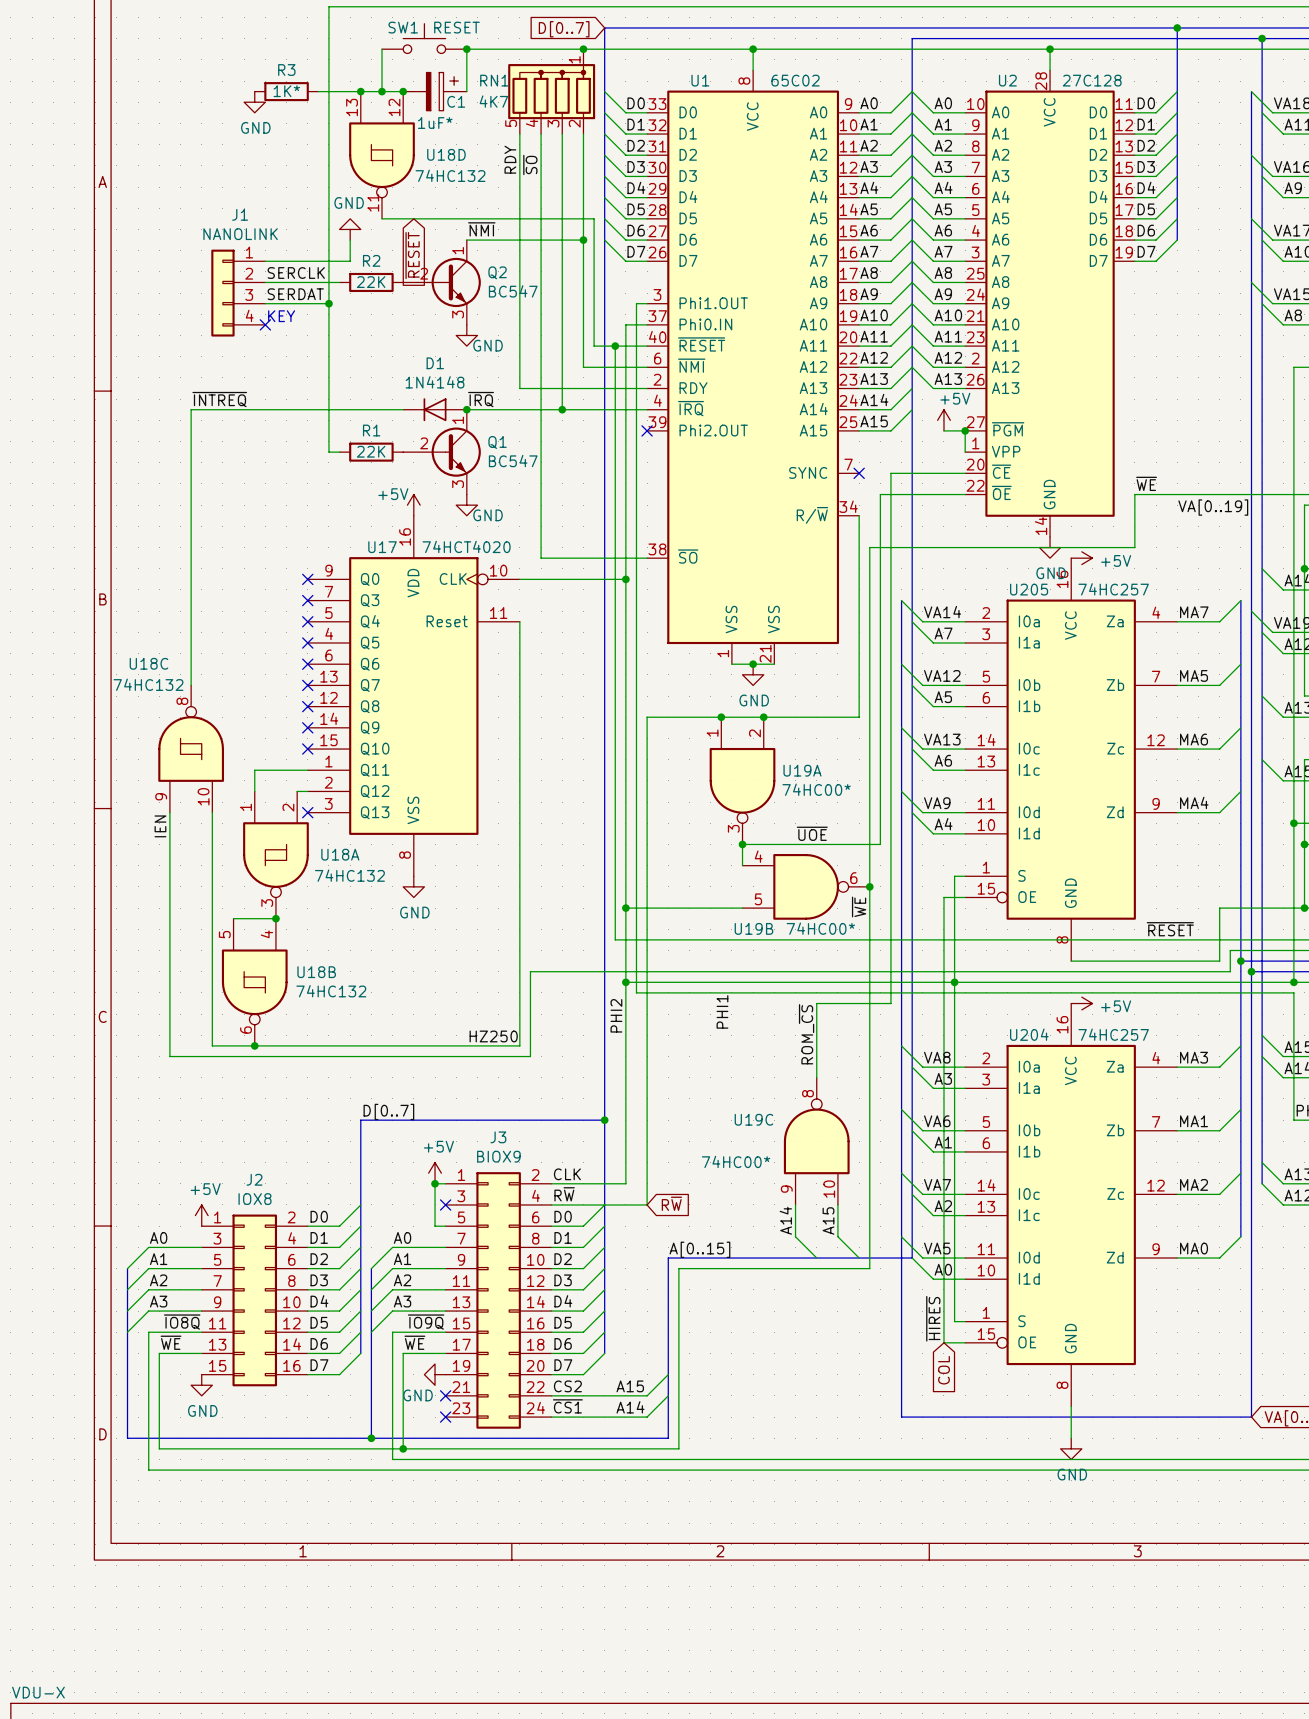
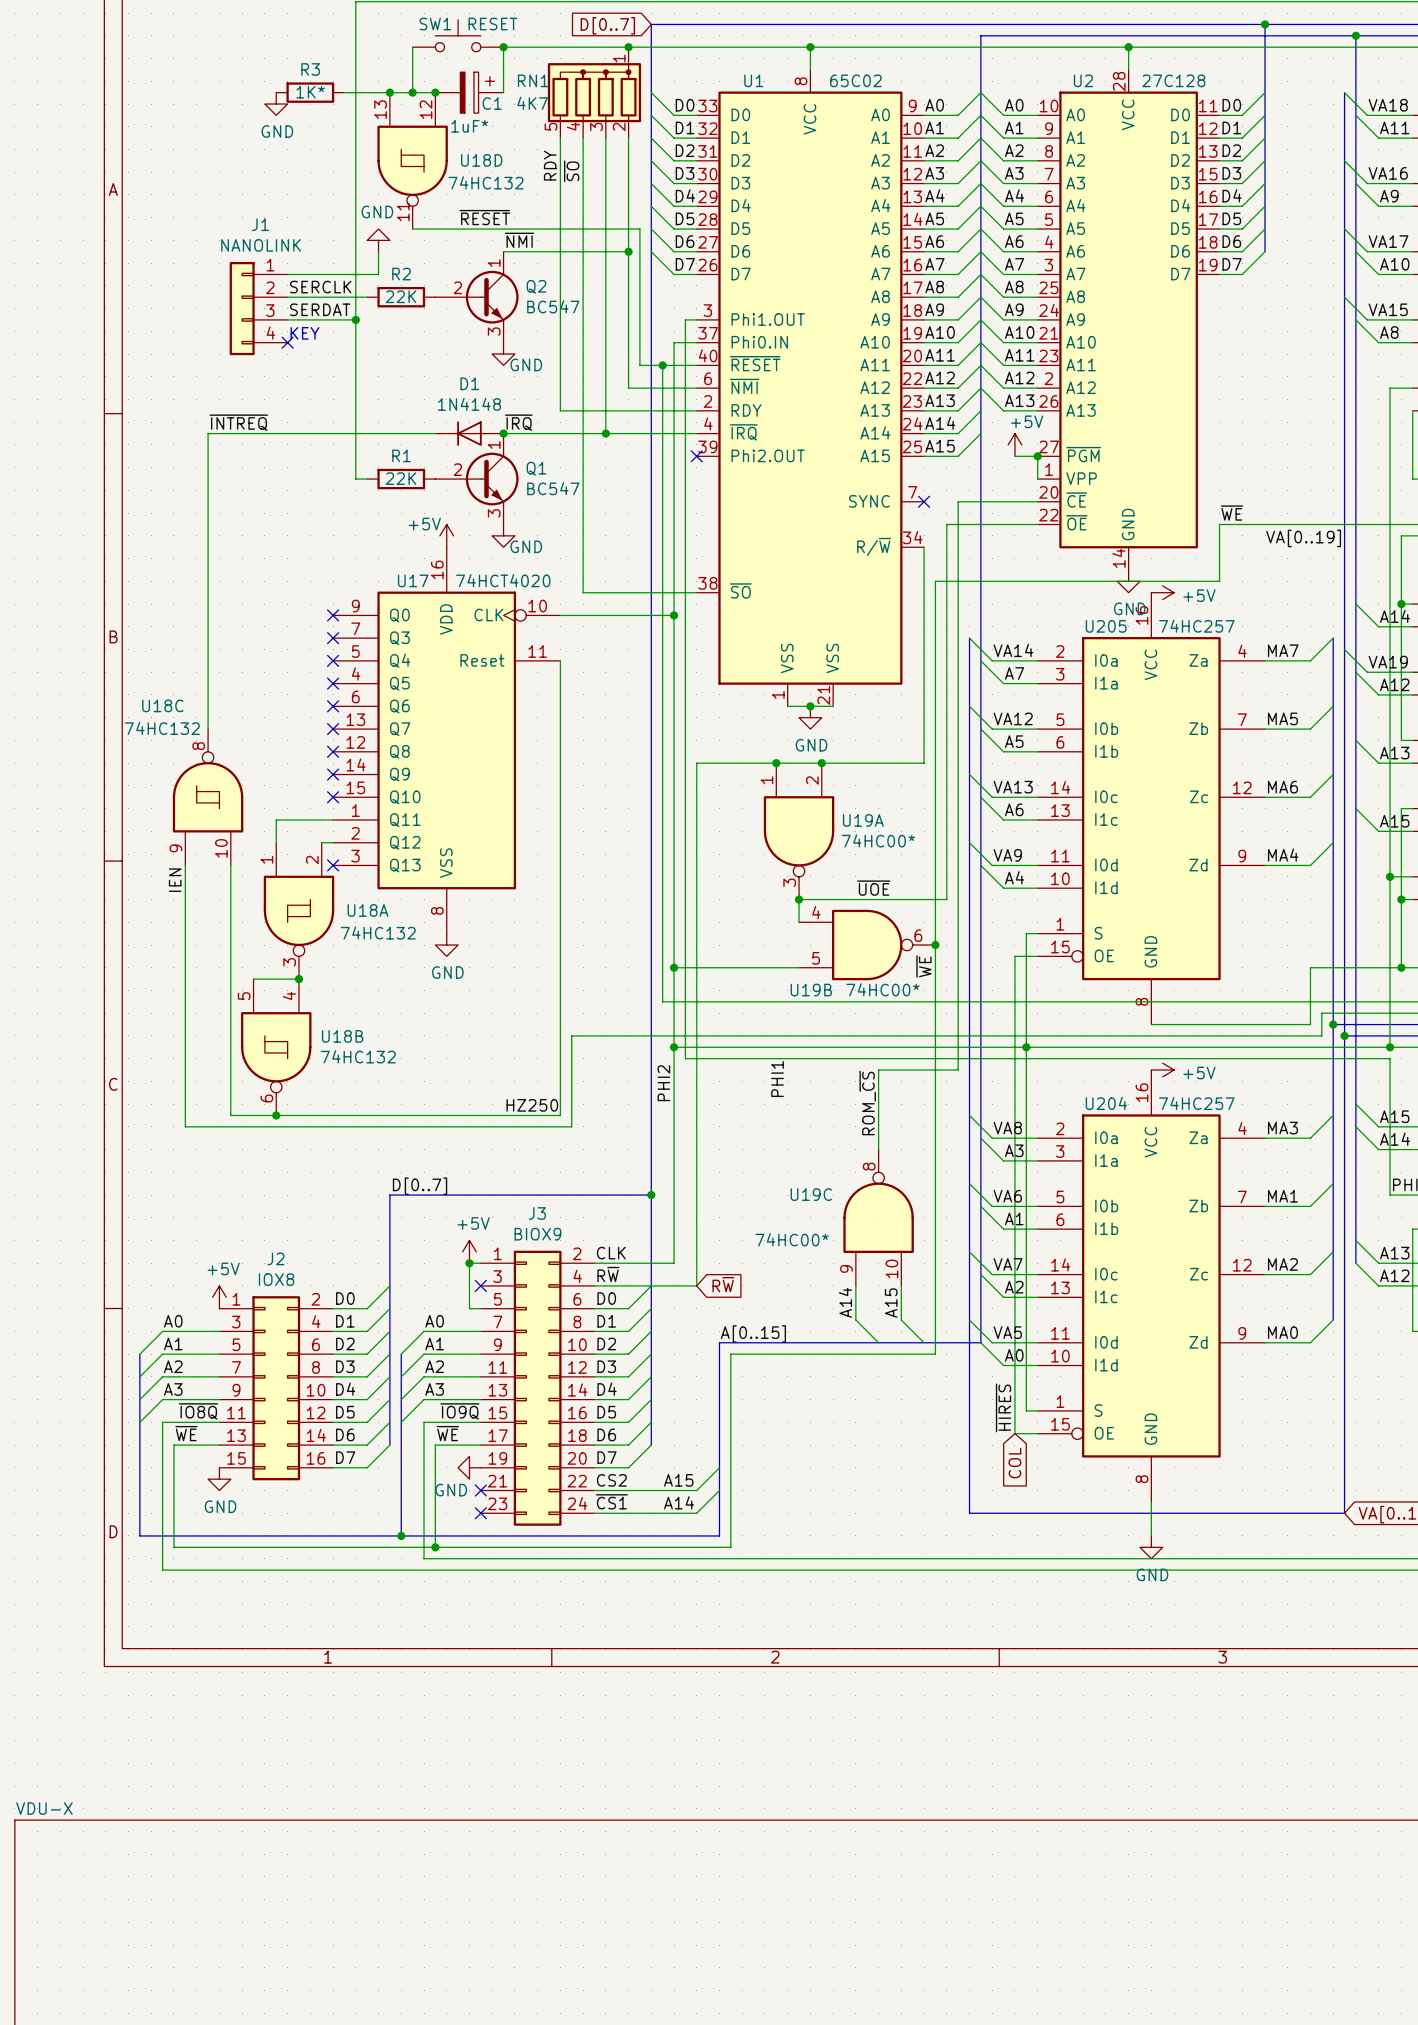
label: none -> ~{RESET} (484, 217)
global label: ~{RESET} (412, 255) -> none
label: ~{RESET} (1170, 929) -> none

